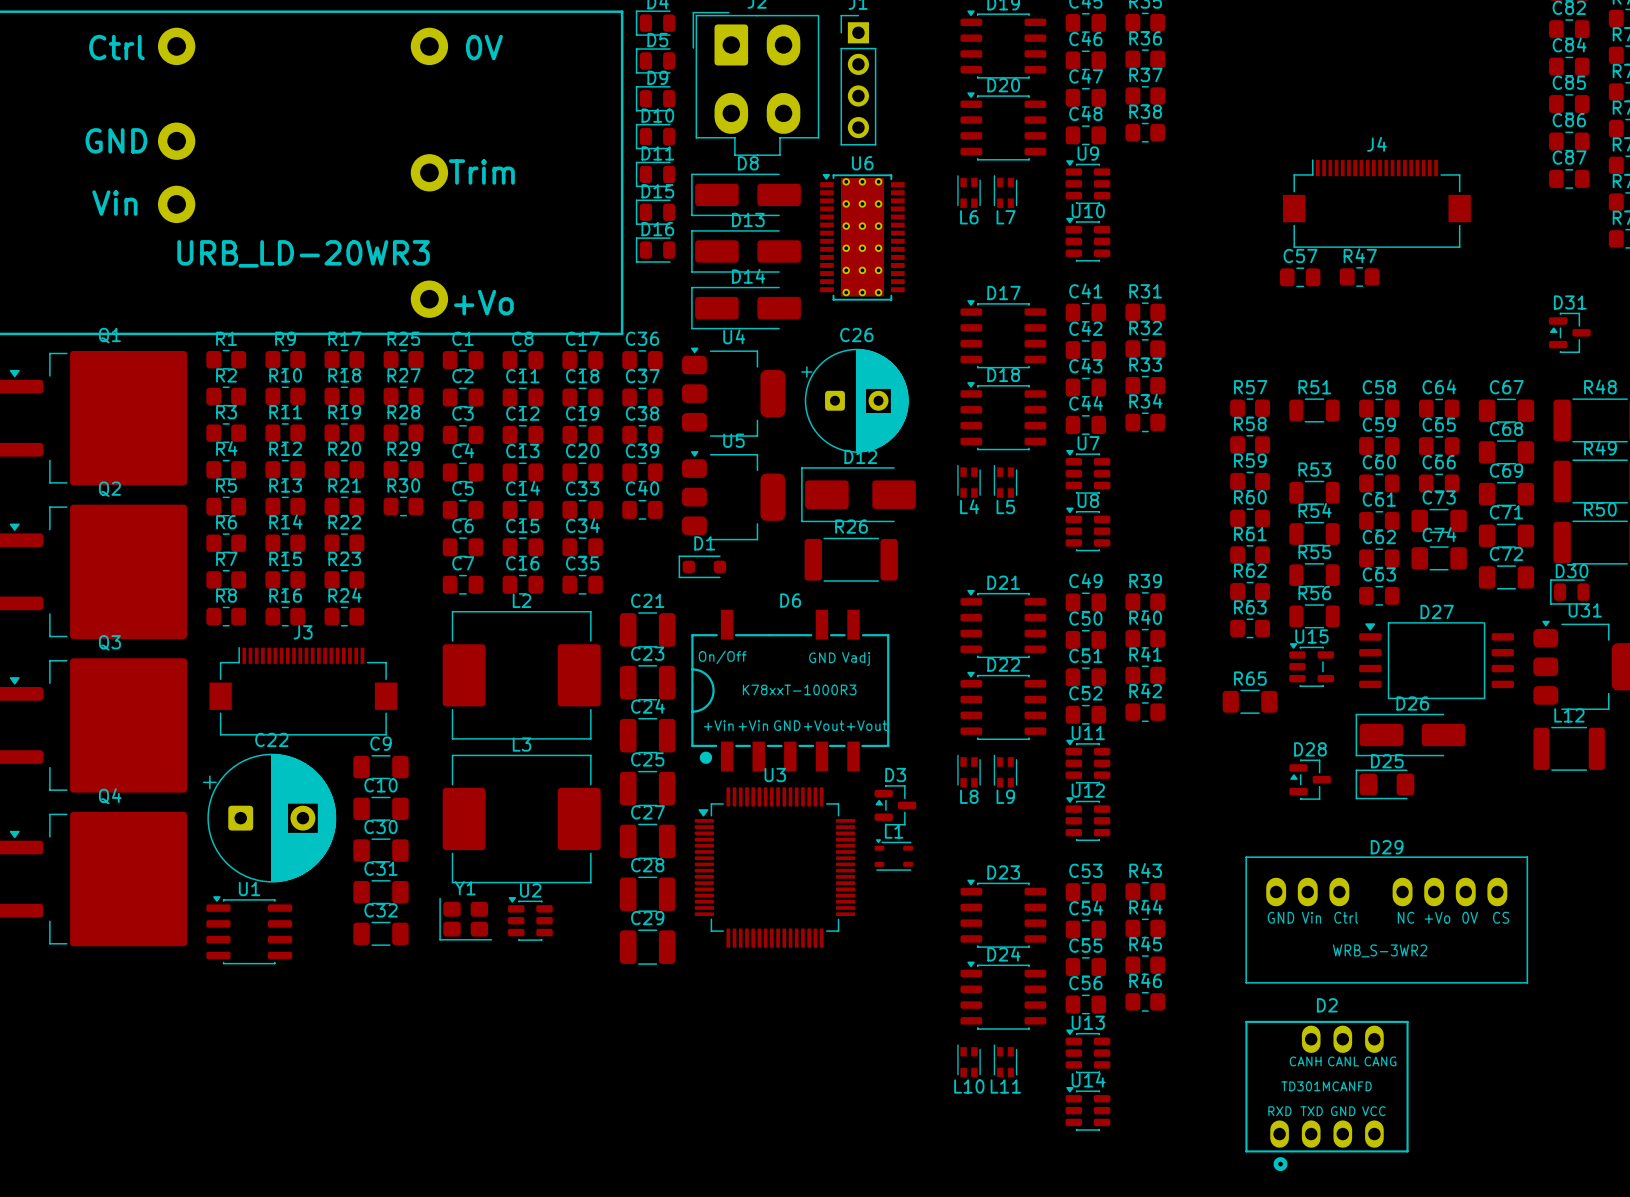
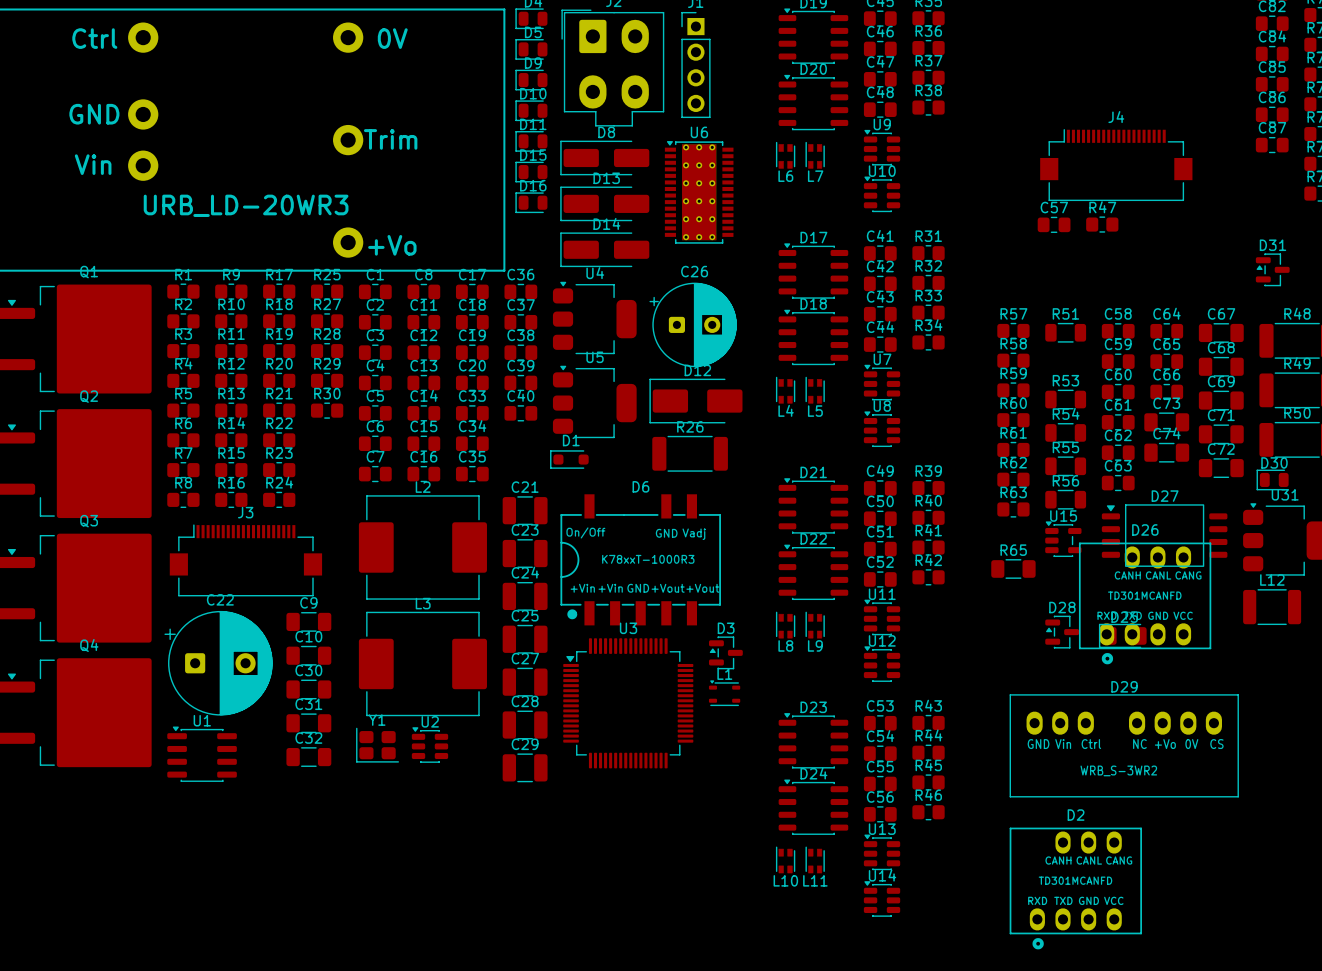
D26 name position: D26 (1412, 703) -> D26 (1145, 529)
D26 footprint: [1355, 713, 1466, 757] -> [1078, 542, 1212, 665]

